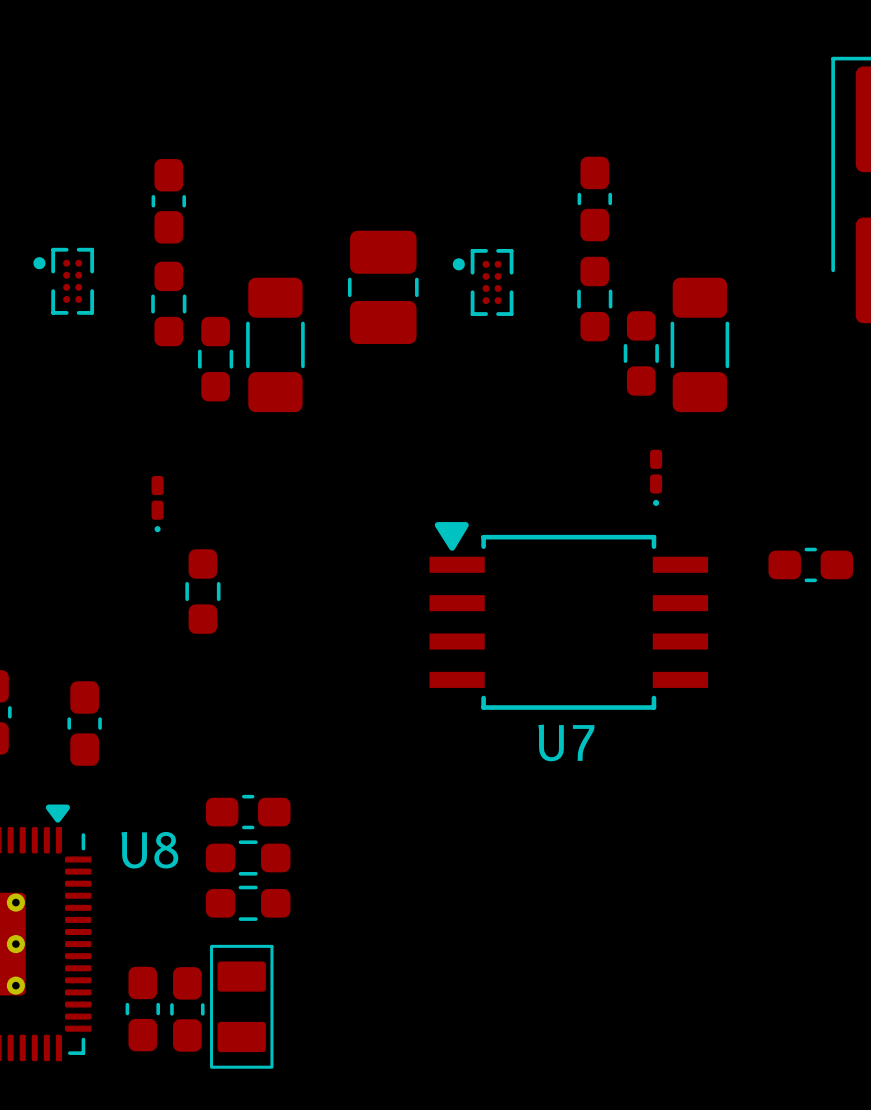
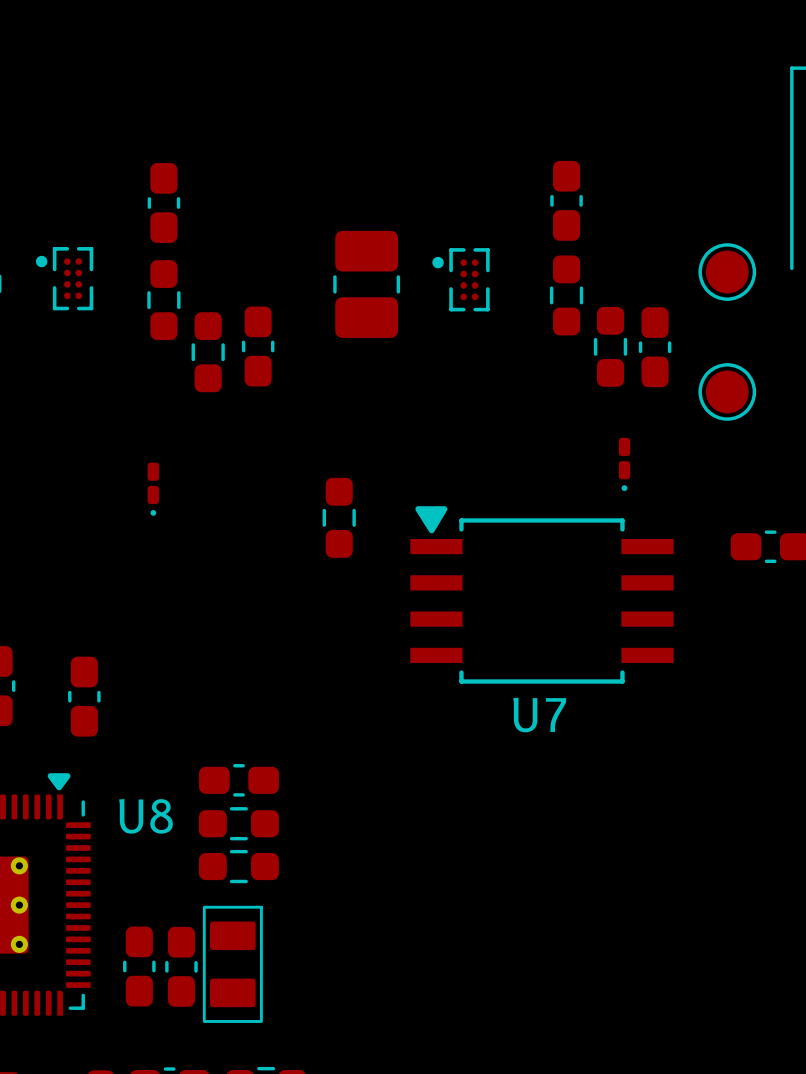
part: none -> (727, 272)
part footprint: [246, 277, 305, 413] -> [241, 306, 275, 387]
part footprint: [670, 277, 730, 413] -> [638, 307, 672, 388]
part: none -> (727, 391)
part position: (202, 591) -> (339, 517)

